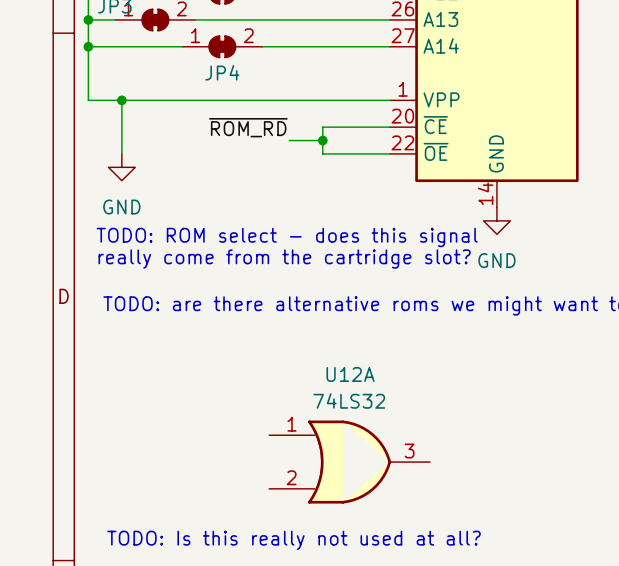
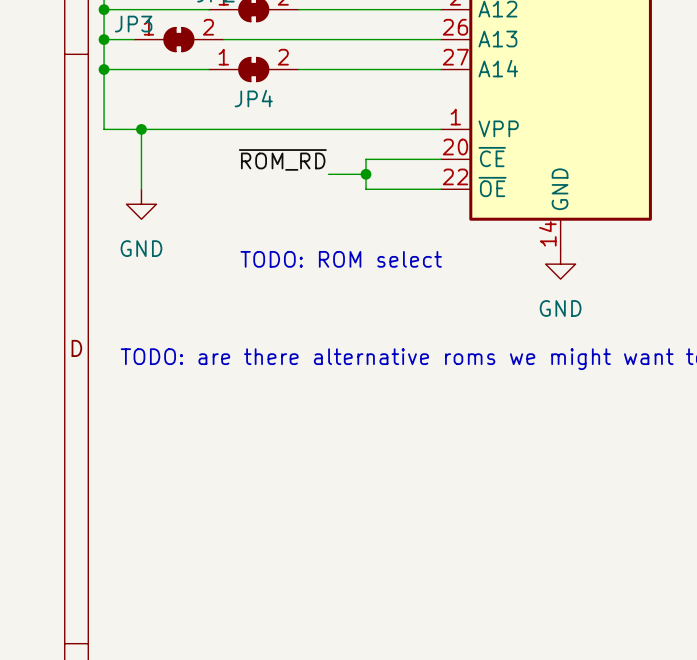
text: TODO: ROM select - does this signal (287, 237) -> TODO: ROM select (341, 259)
text: really come from the cartridge slot? (284, 259) -> none
U12A: 74LS32 (349, 462) -> none
text: TODO: Is this really not used at all? (293, 540) -> none

